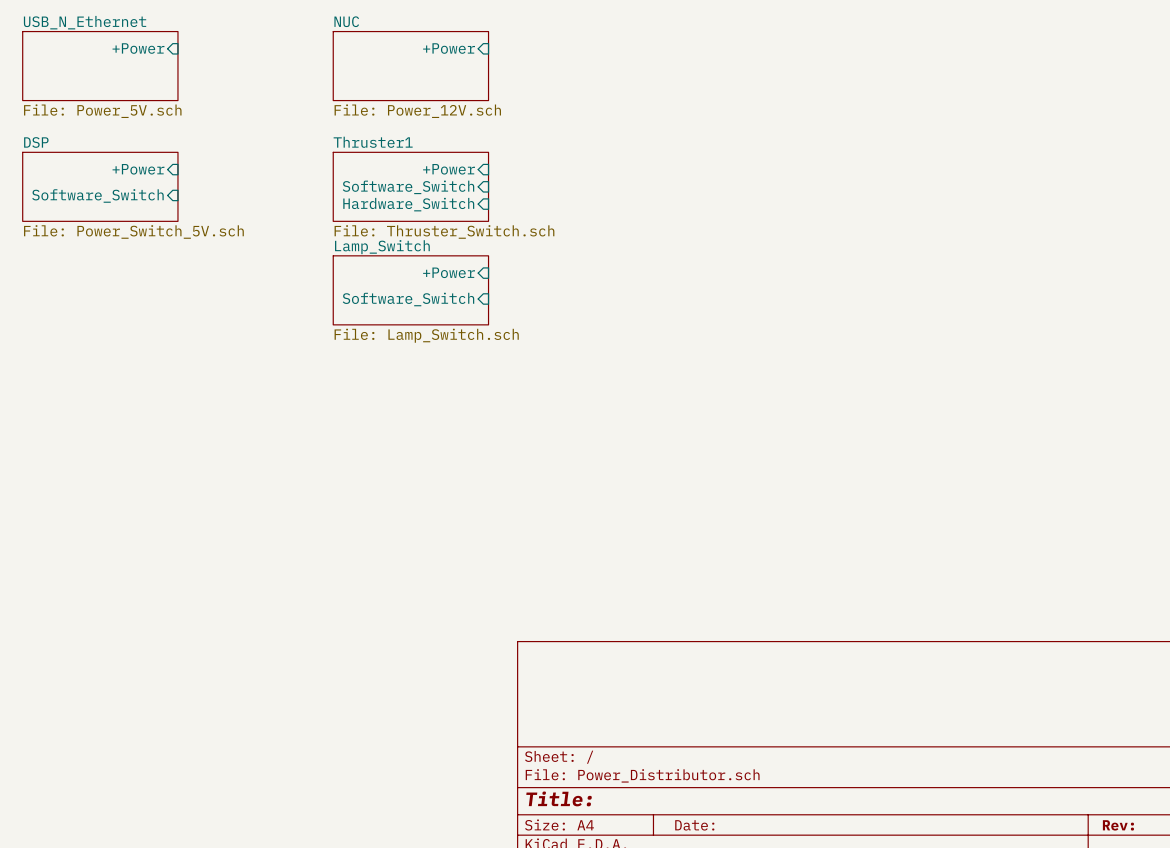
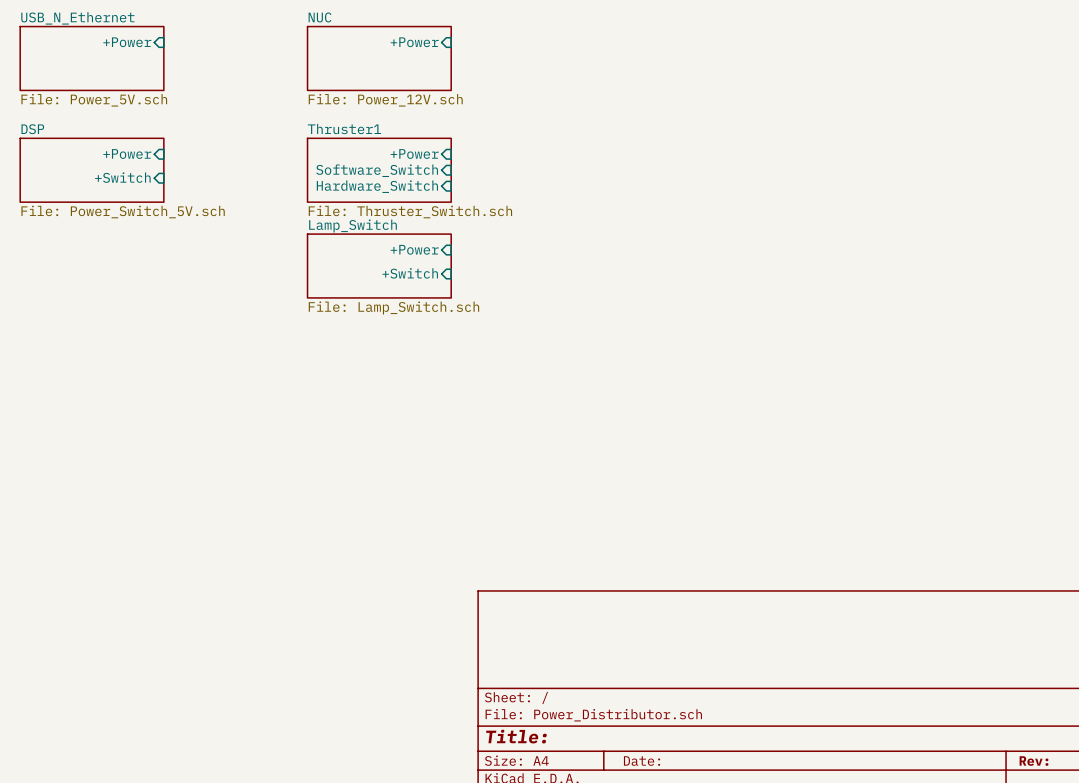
sheet pin: Software_Switch (97, 195) -> +Switch (122, 177)
sheet pin: Software_Switch (408, 299) -> +Switch (410, 273)

